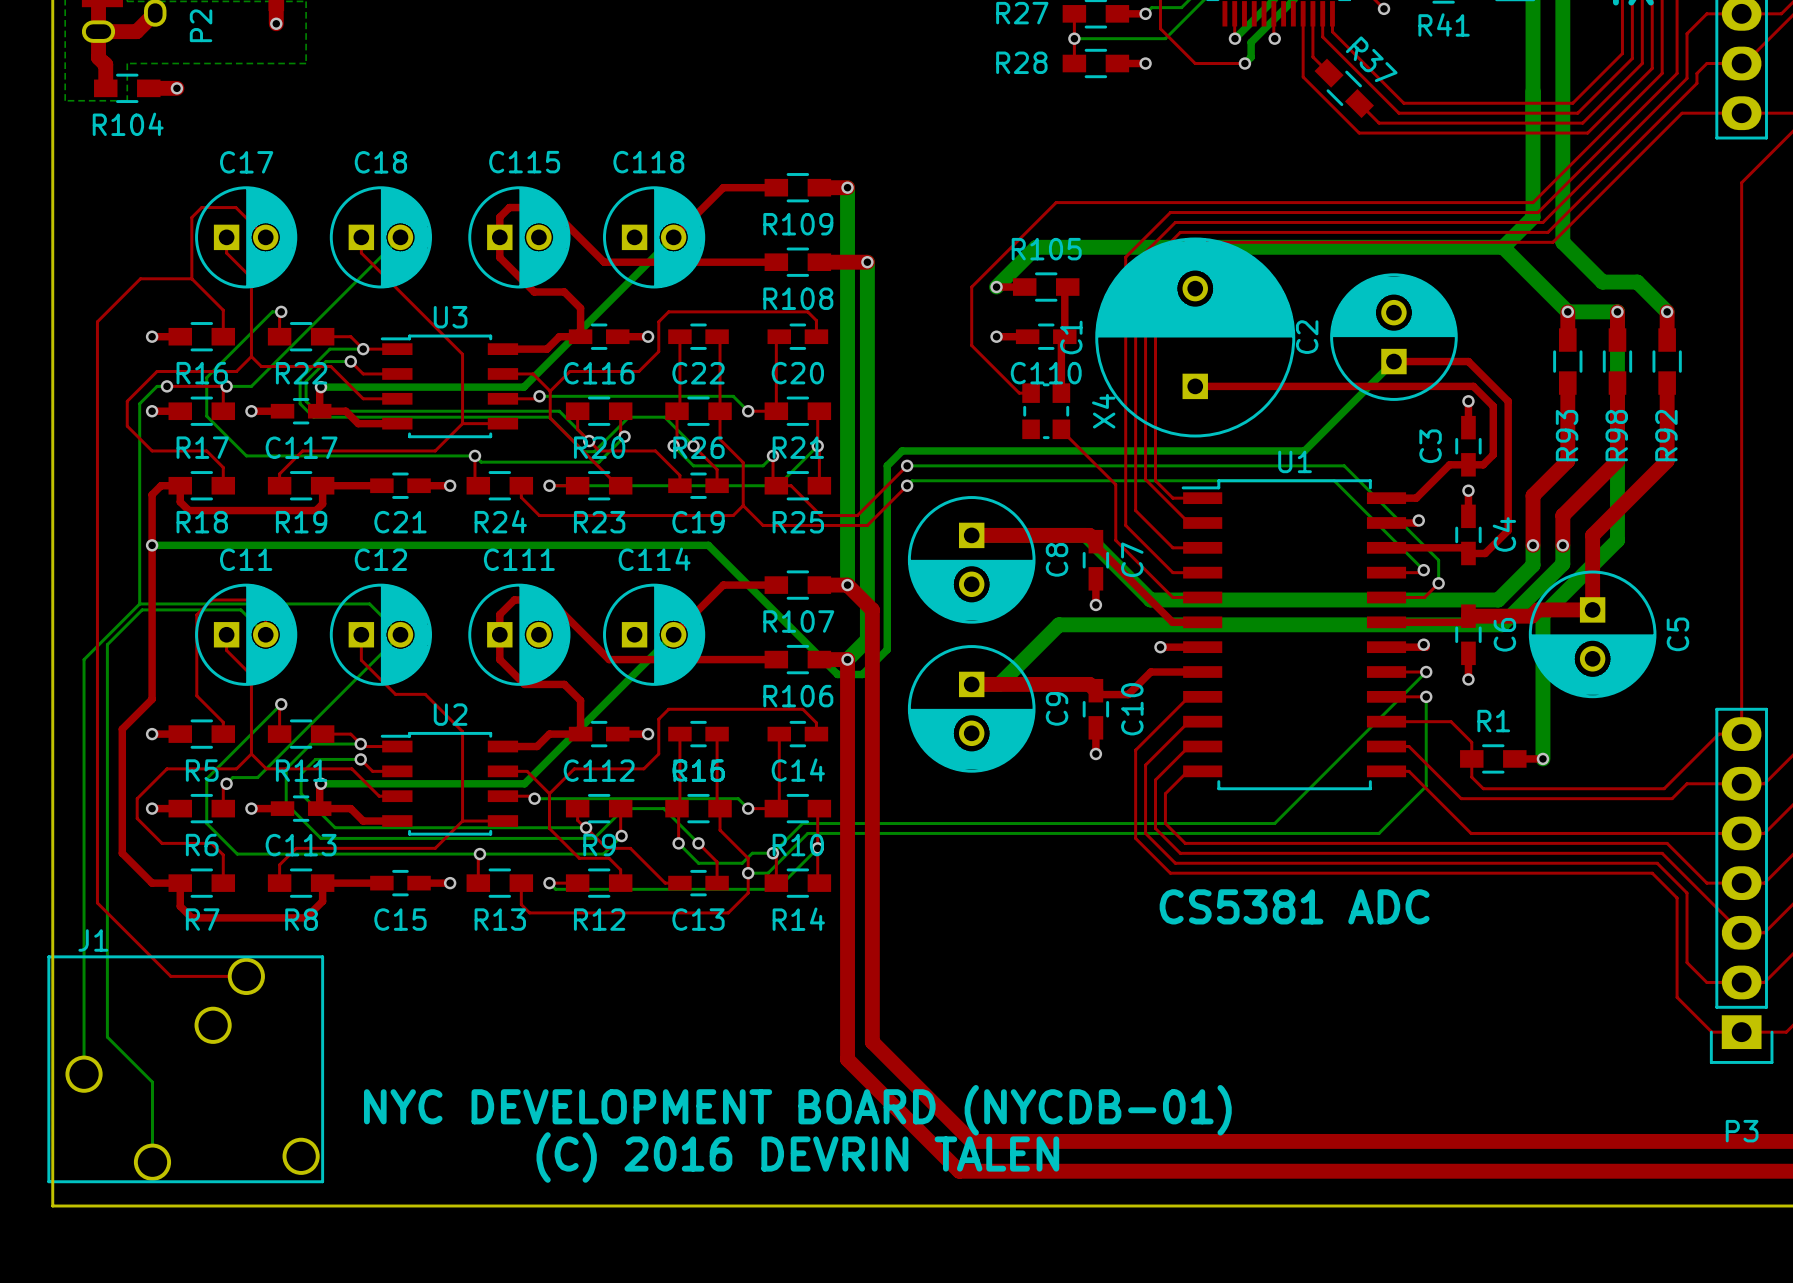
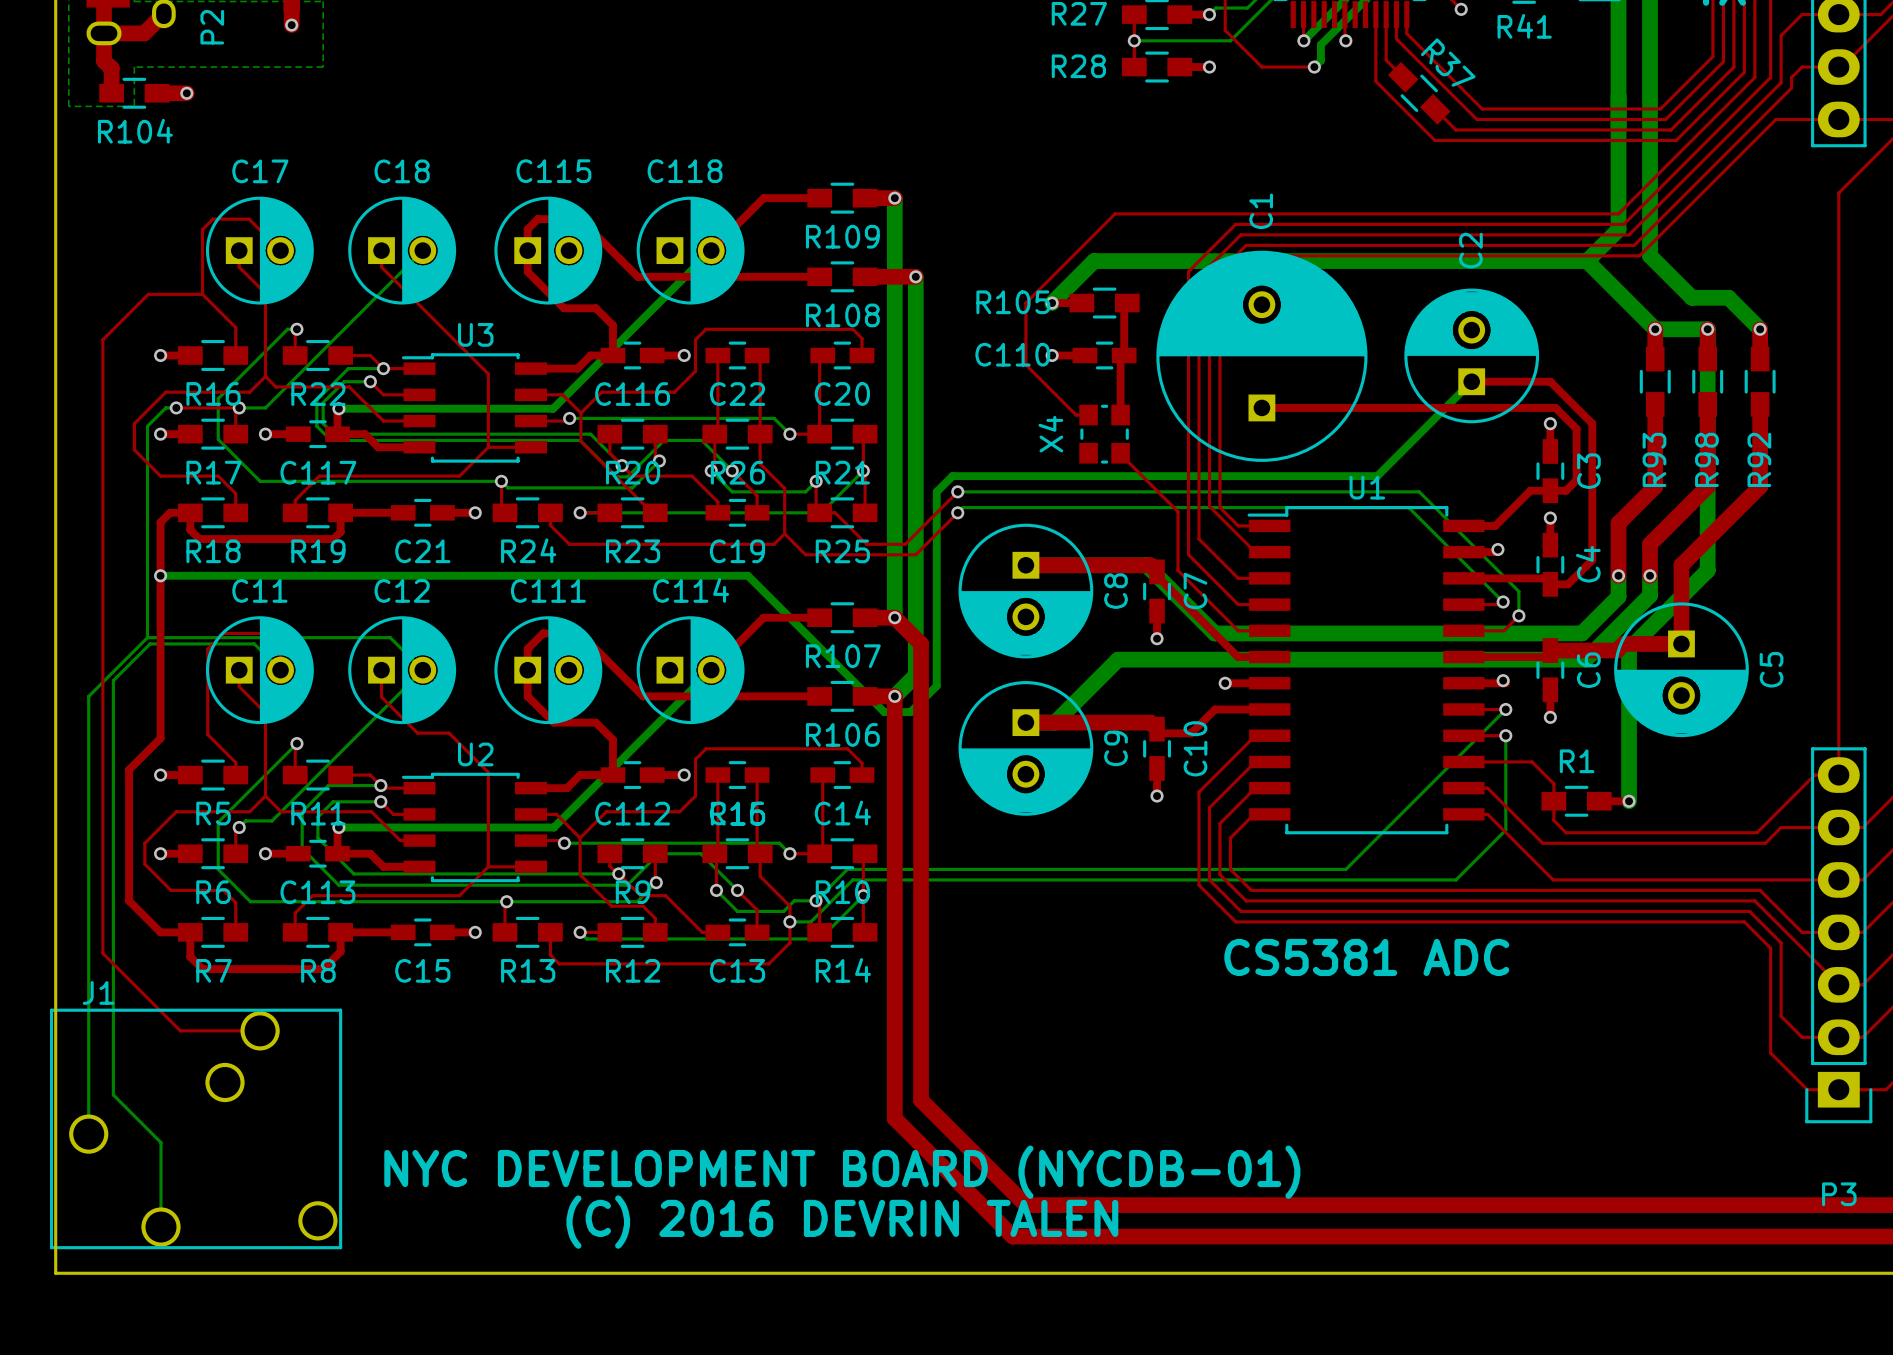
R105 name position: R105 (1046, 249) -> R105 (1013, 302)
C1 name position: C1 (1071, 337) -> C1 (1261, 211)
C2 name position: C2 (1307, 337) -> C2 (1470, 250)
C110 name position: C110 (1046, 373) -> C110 (1012, 354)
X4 name position: X4 (1103, 411) -> X4 (1050, 434)
C3 name position: C3 (1430, 446) -> C3 (1588, 471)

